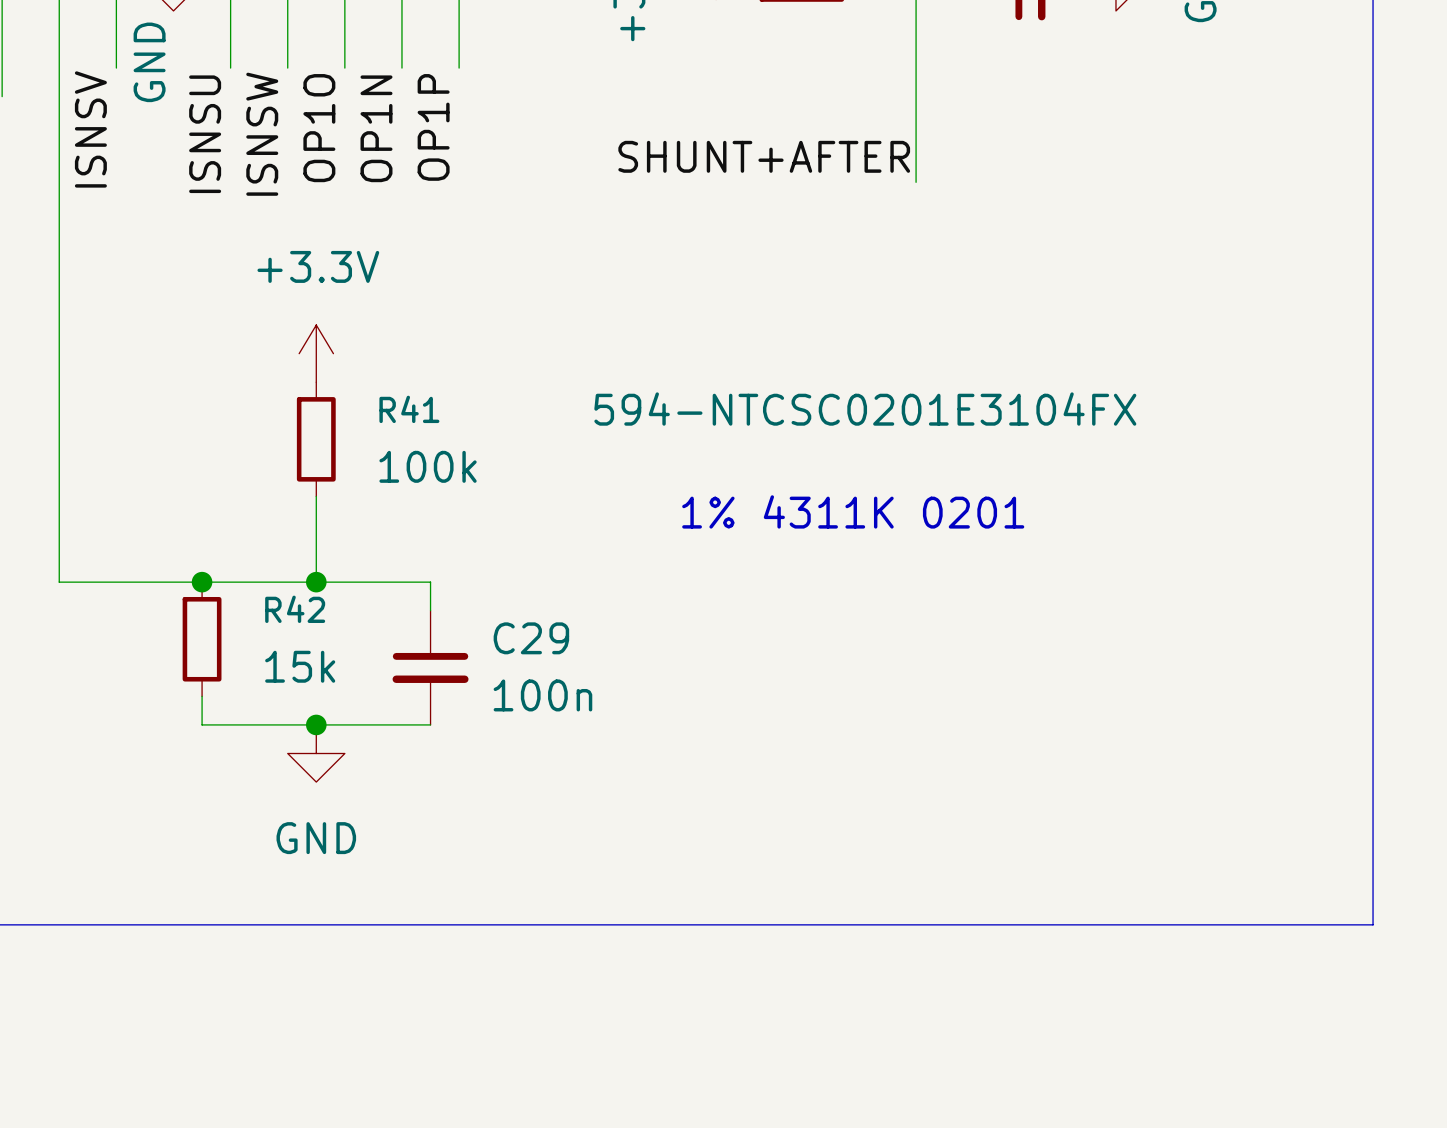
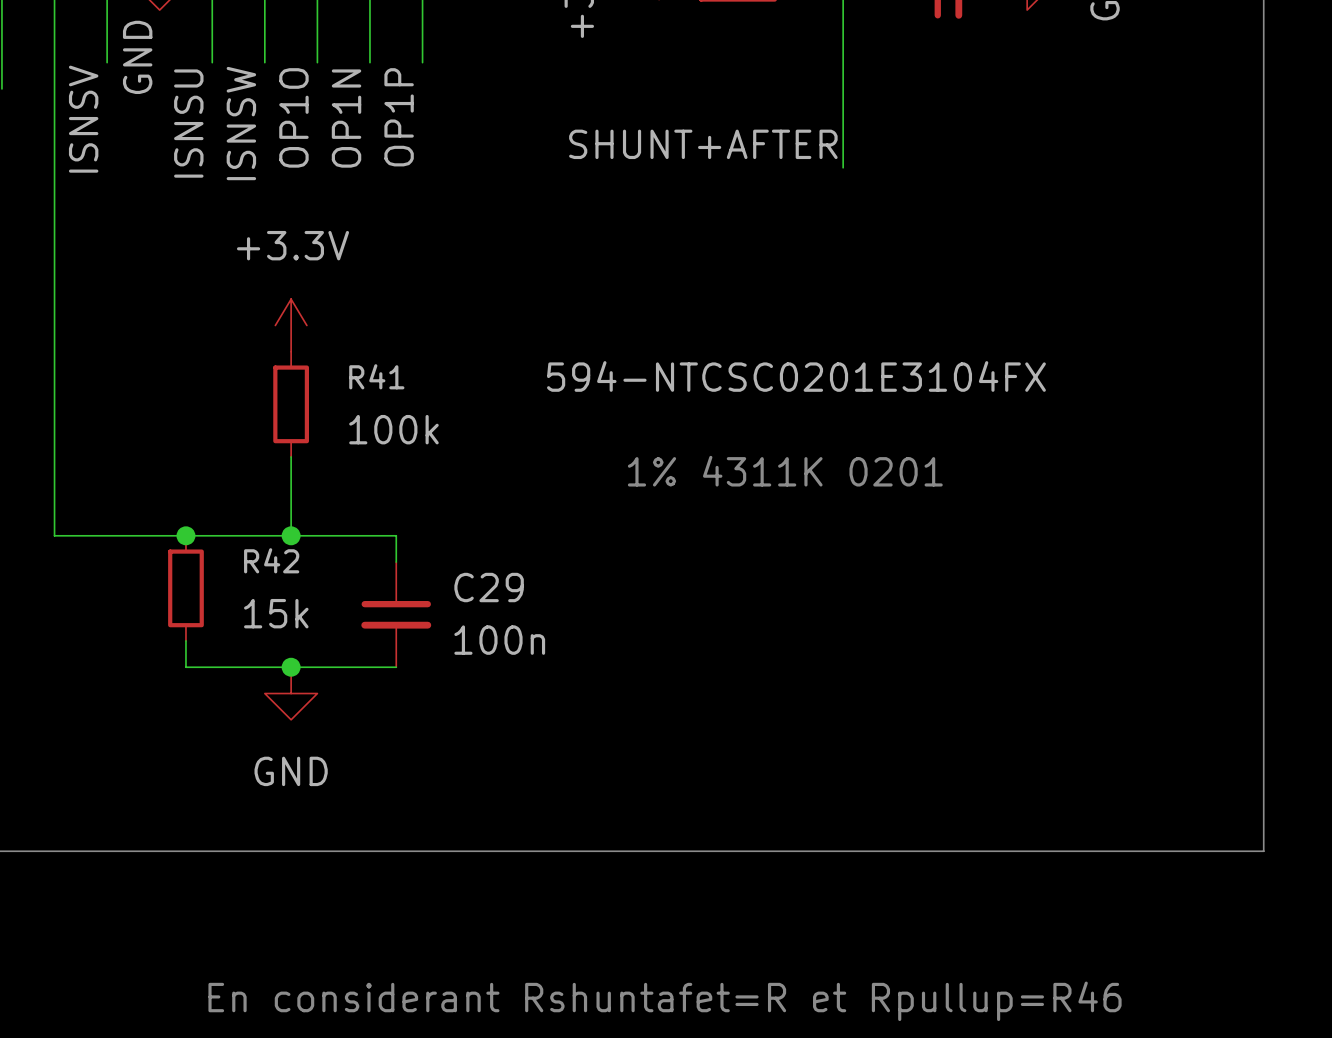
text: none -> En considerant Rshuntafet=R et Rpullup=R46 (665, 1001)

